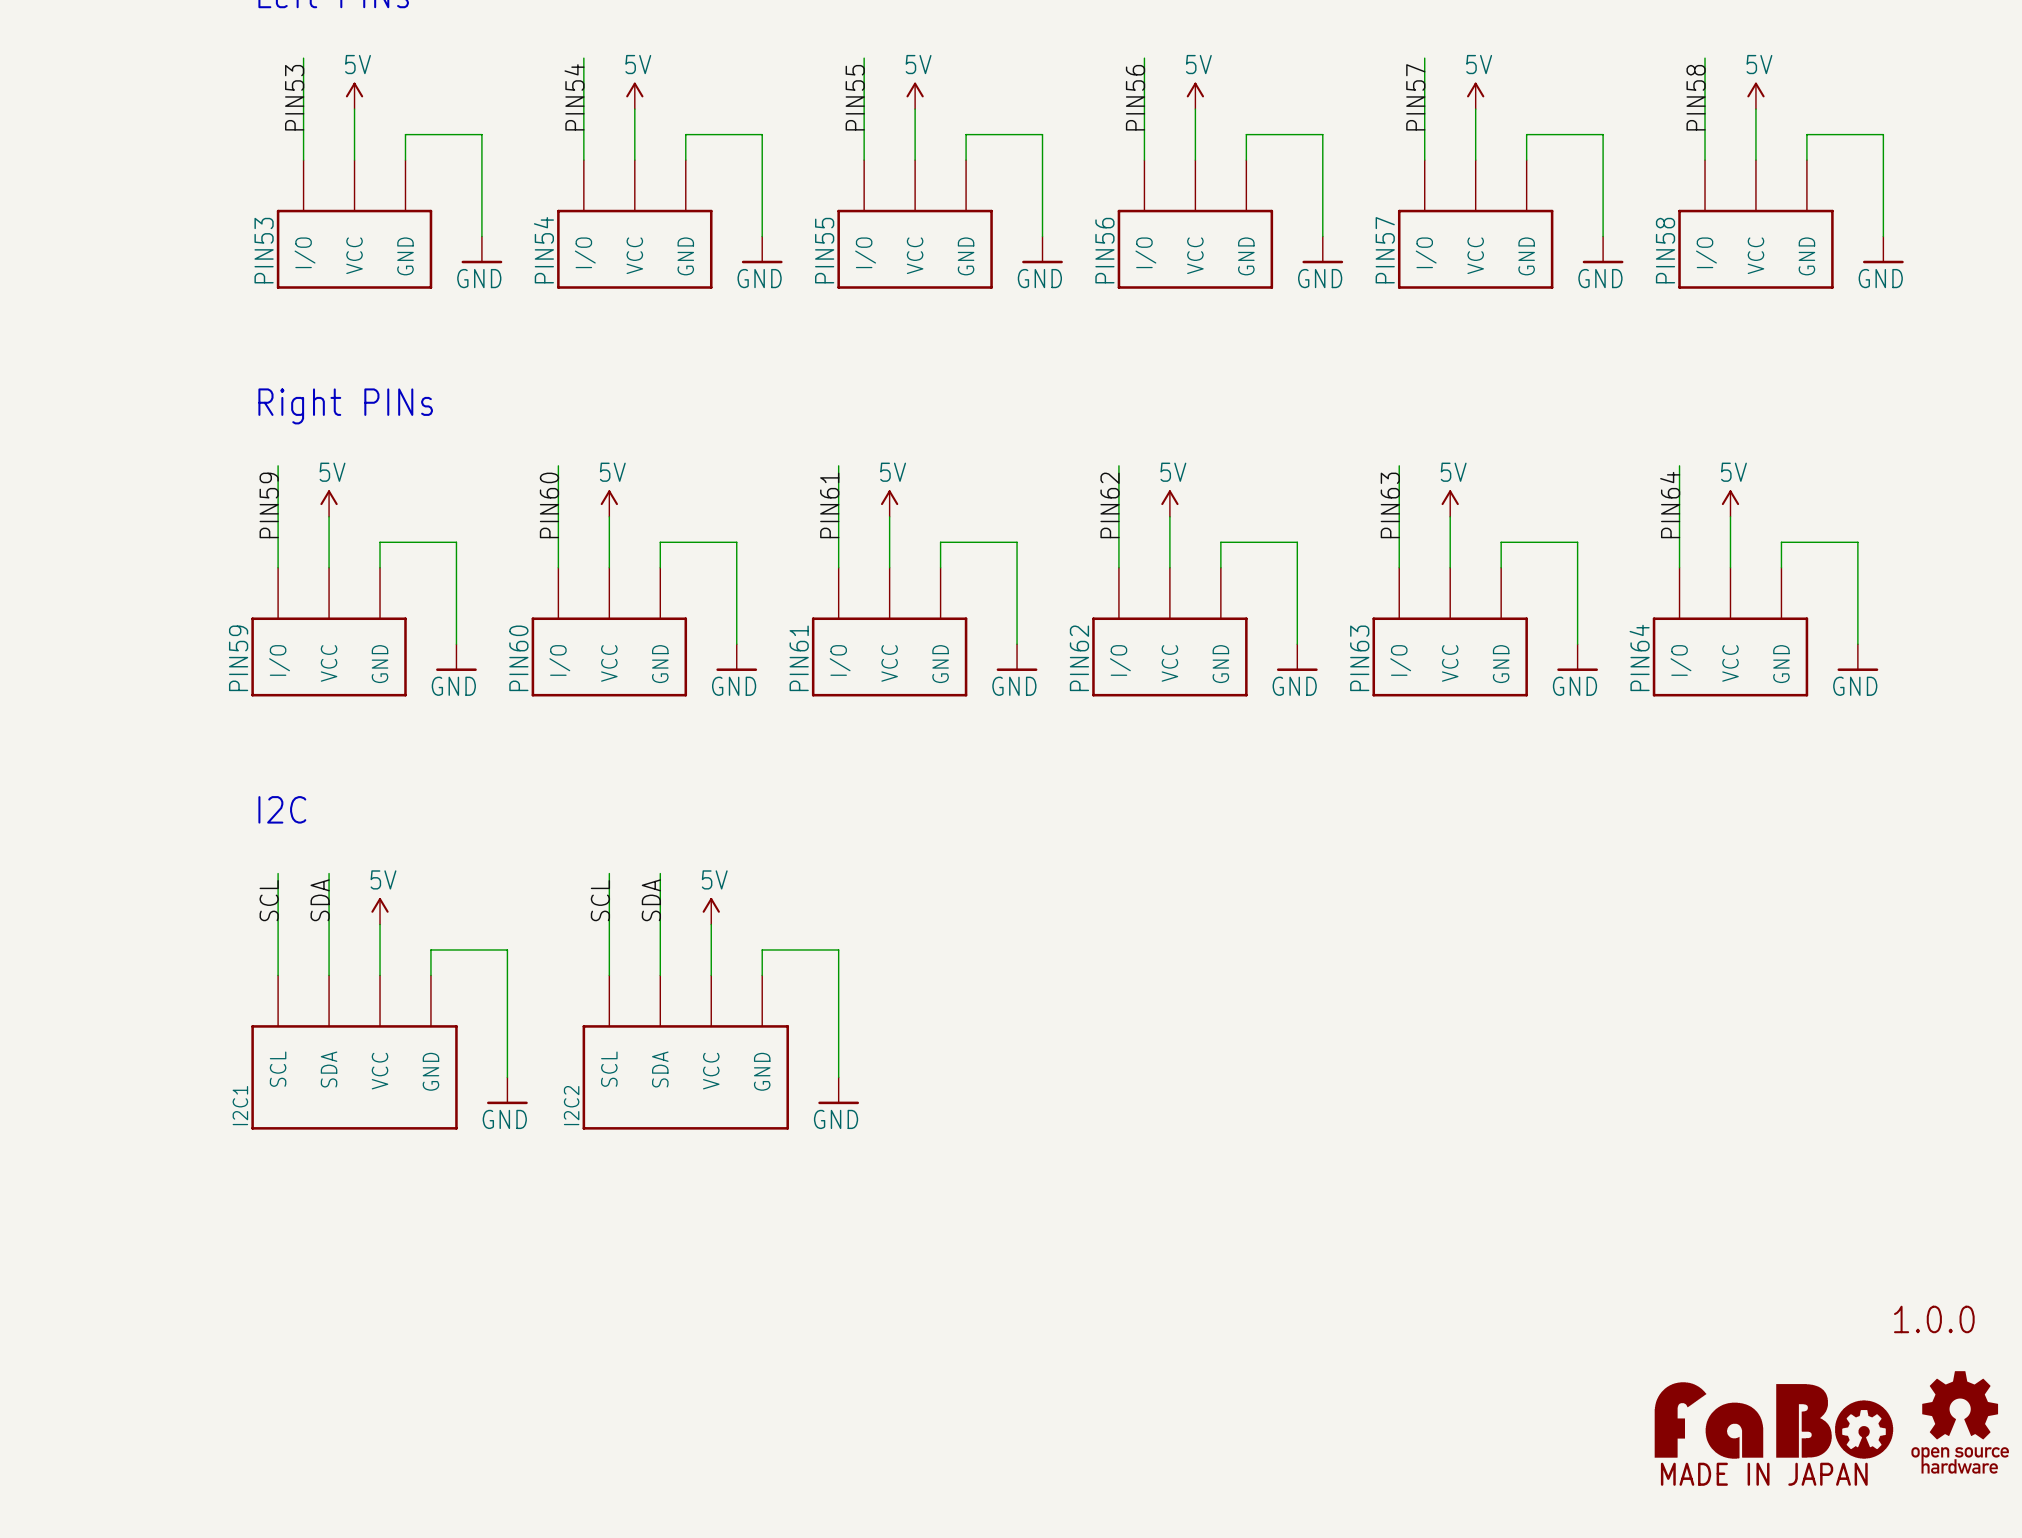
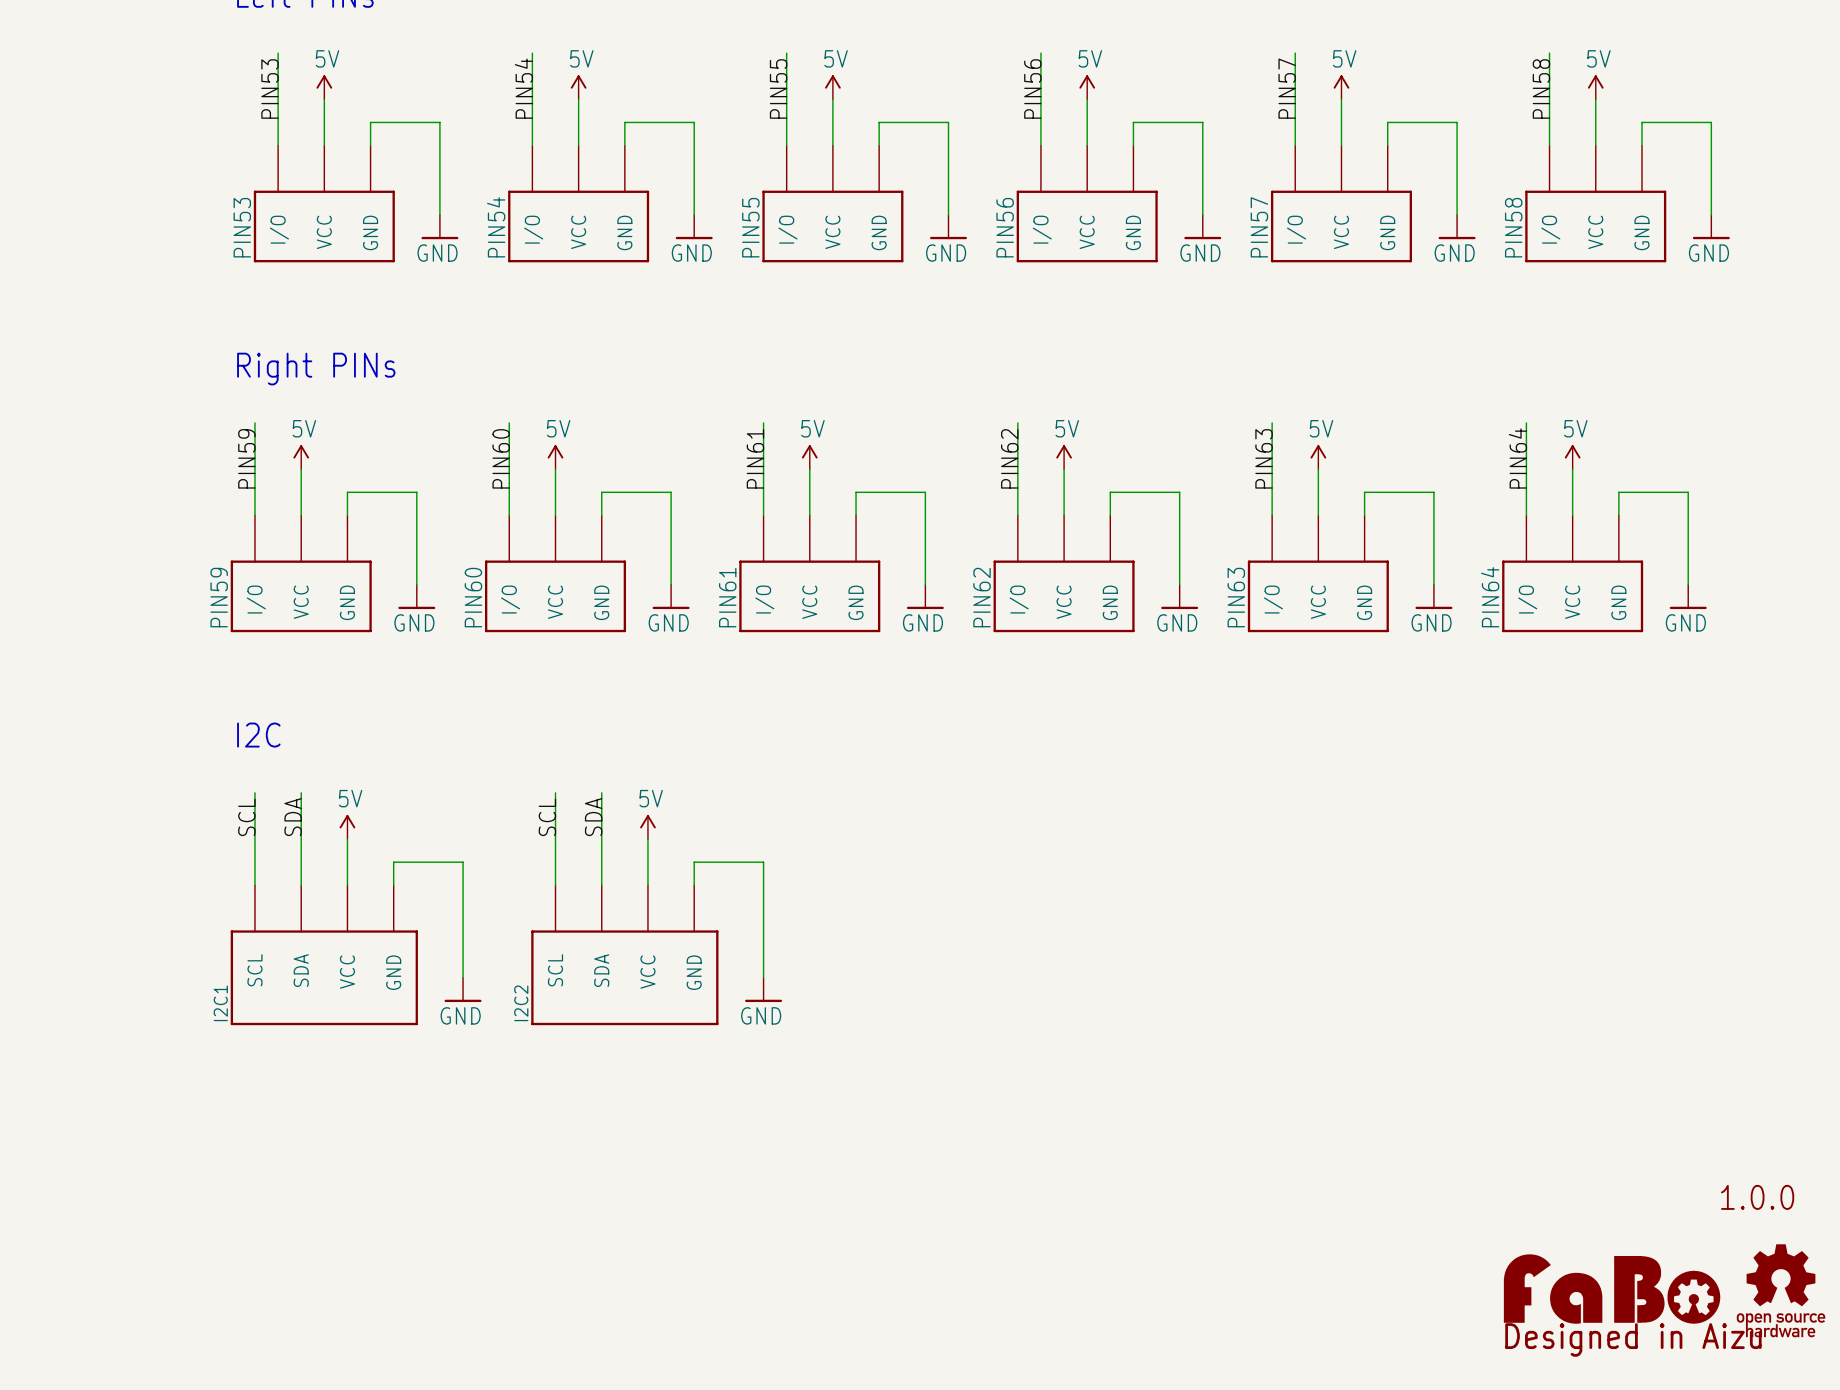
part text: MADE IN JAPAN (1764, 1474) -> none
part text: none -> Designed in Aizu (1633, 1339)

